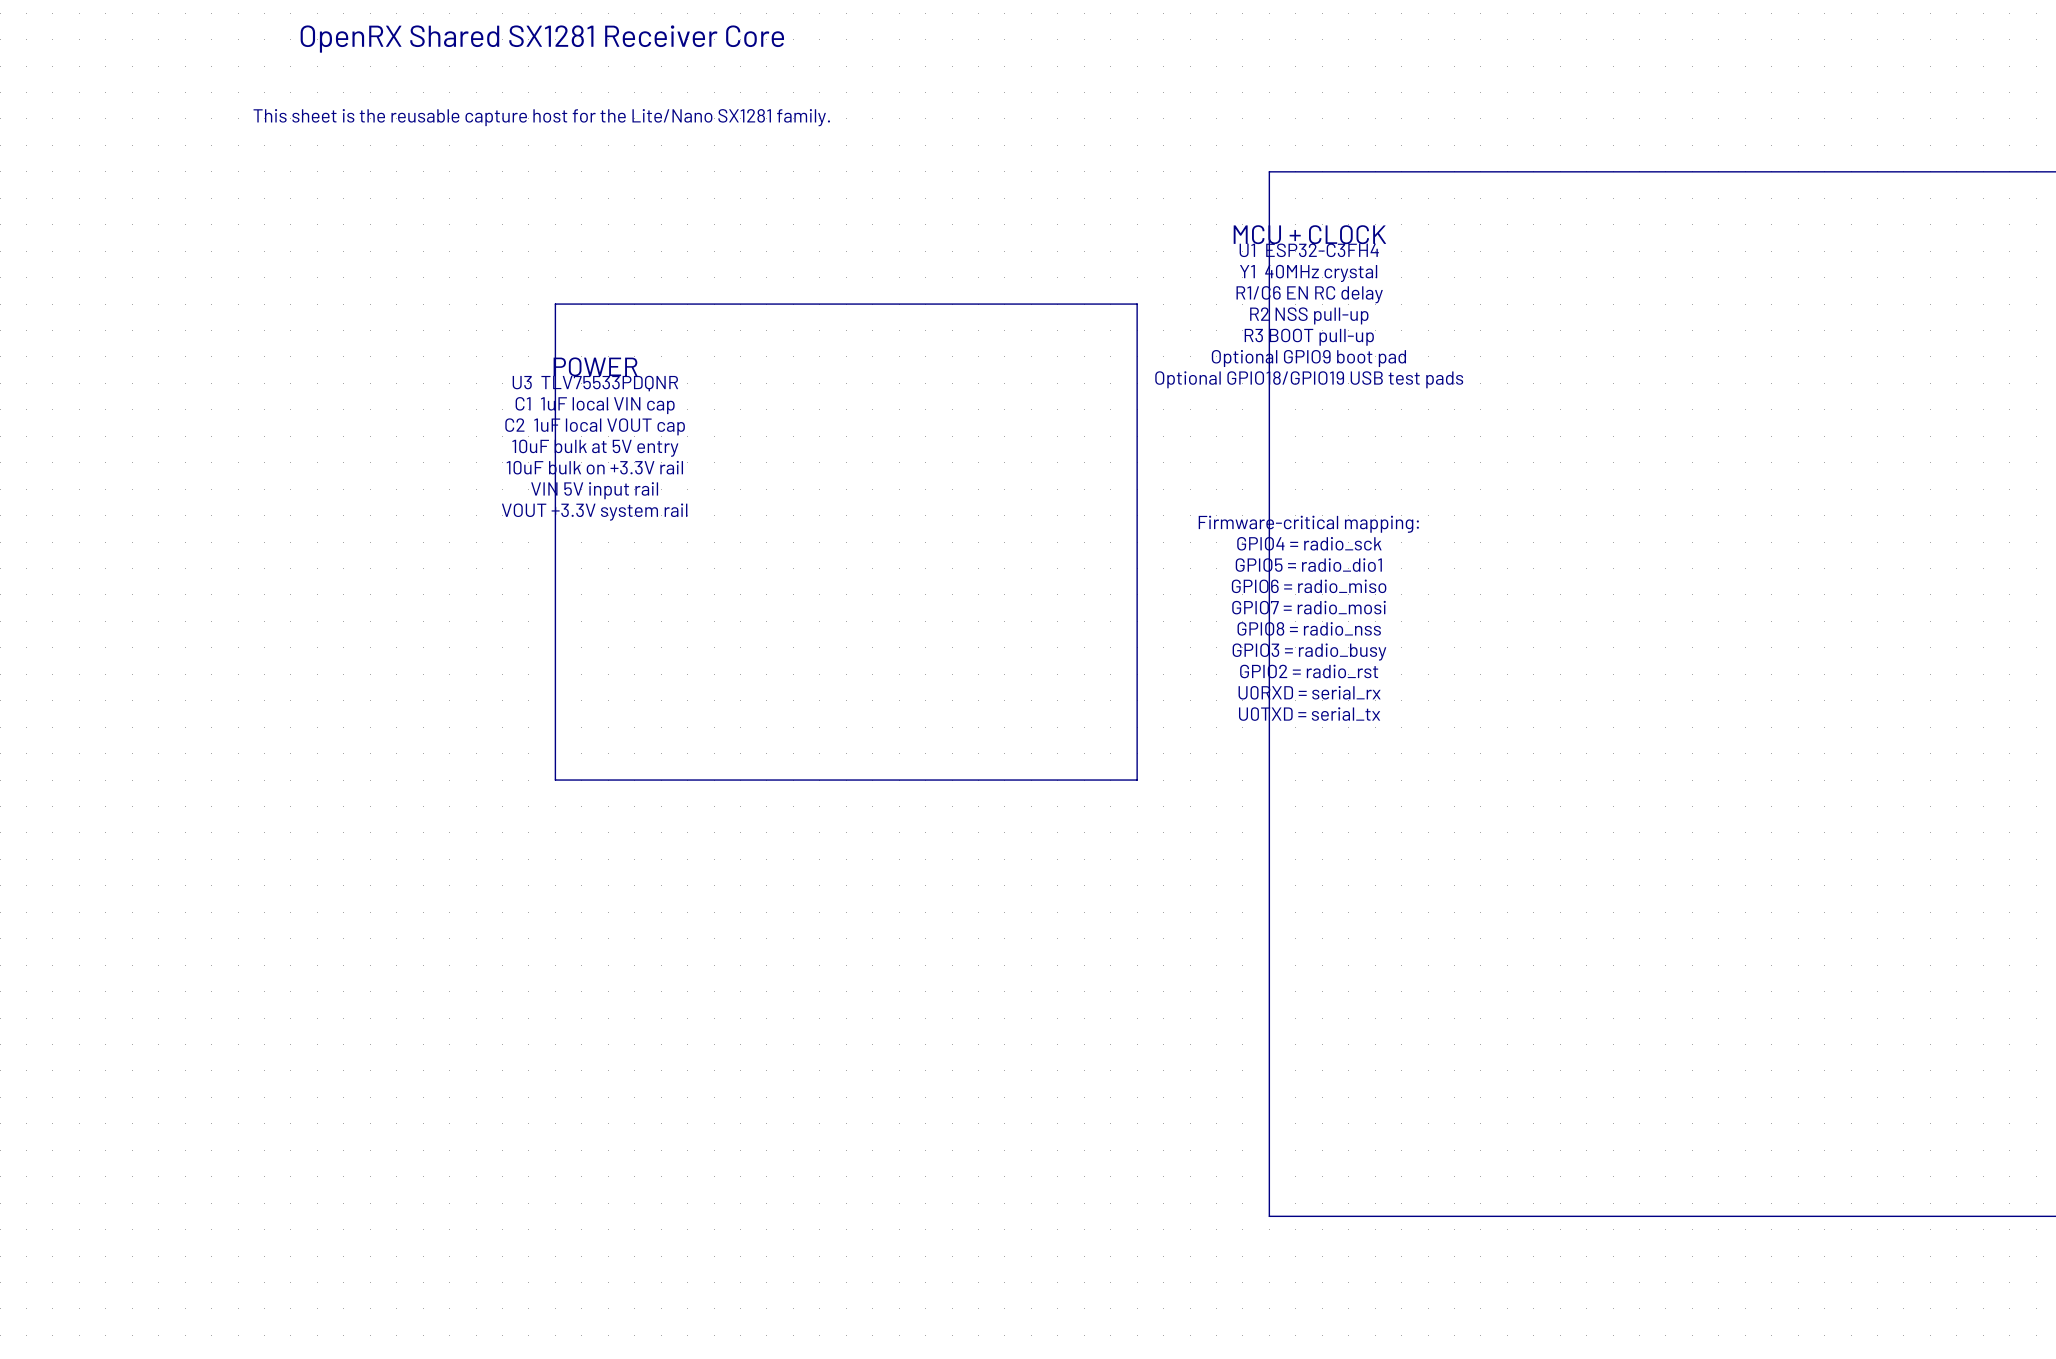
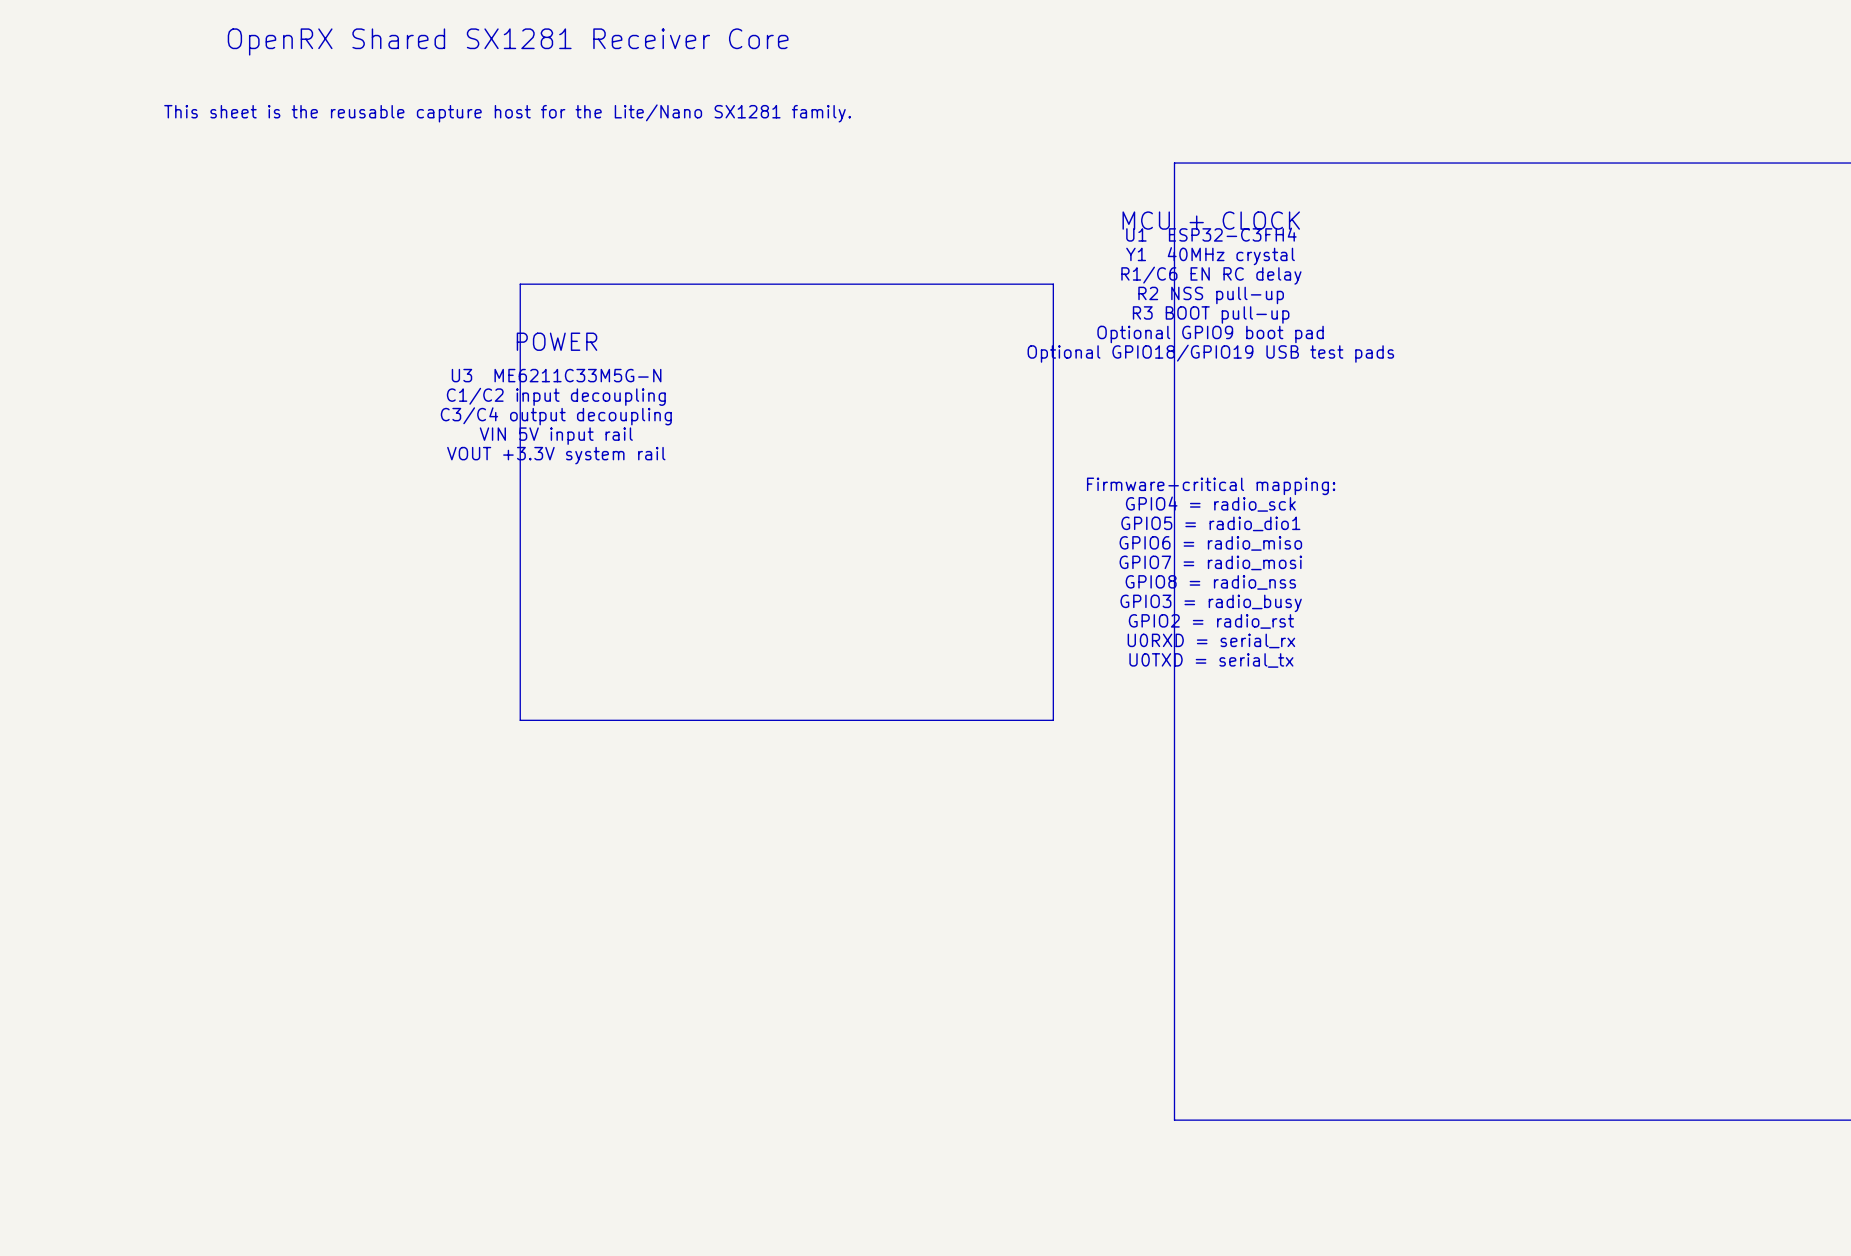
text: U3 TLV75533PDQNR (595, 383) -> none
text: C1 1uF local VIN cap (595, 405) -> U3 ME6211C33M5G-N (556, 375)
text: C2 1uF local VOUT cap (595, 426) -> C1/C2 input decoupling (556, 396)
text: 10uF bulk at 5V entry (595, 448) -> C3/C4 output decoupling (556, 416)
text: 10uF bulk on +3.3V rail (594, 467) -> VIN 5V input rail (556, 436)
text: VIN 5V input rail (594, 490) -> VOUT +3.3V system rail (556, 455)
text: VOUT +3.3V system rail (594, 512) -> none

